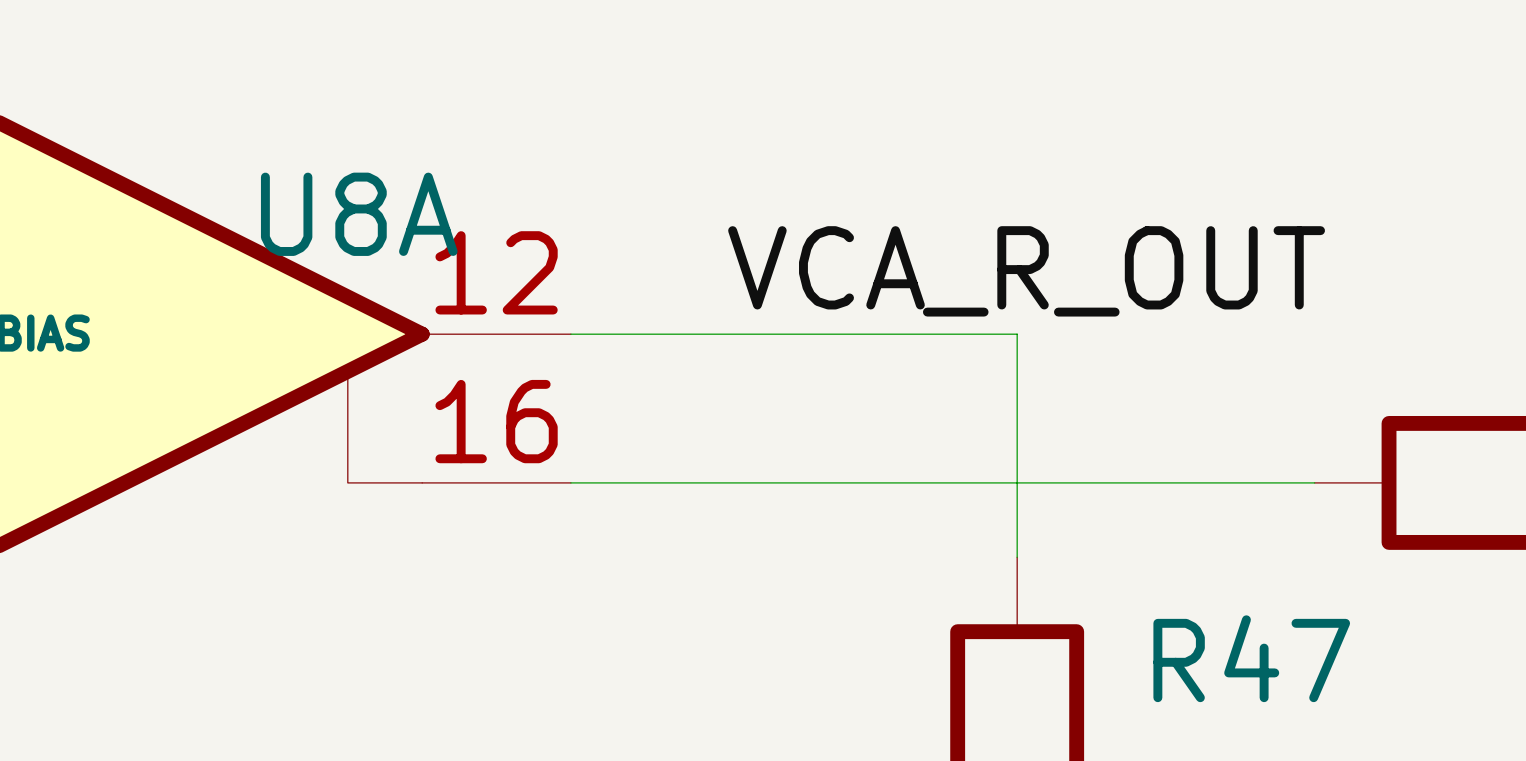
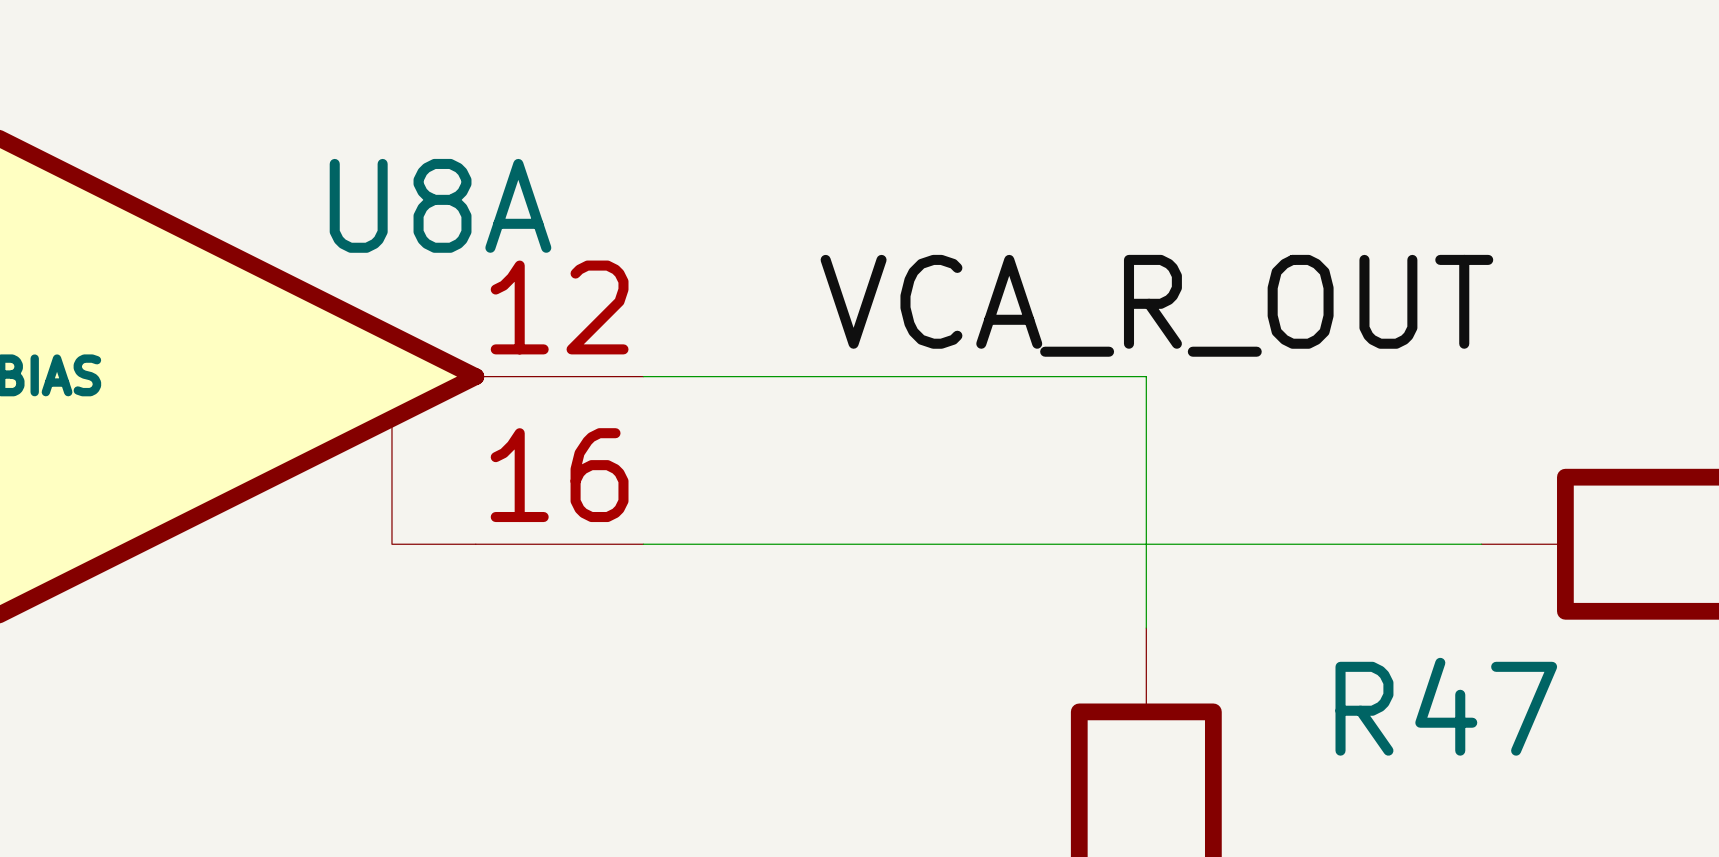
U8A name position: U8A (359, 214) -> U8A (440, 205)
R47 name position: R47 (1251, 658) -> R47 (1446, 706)

